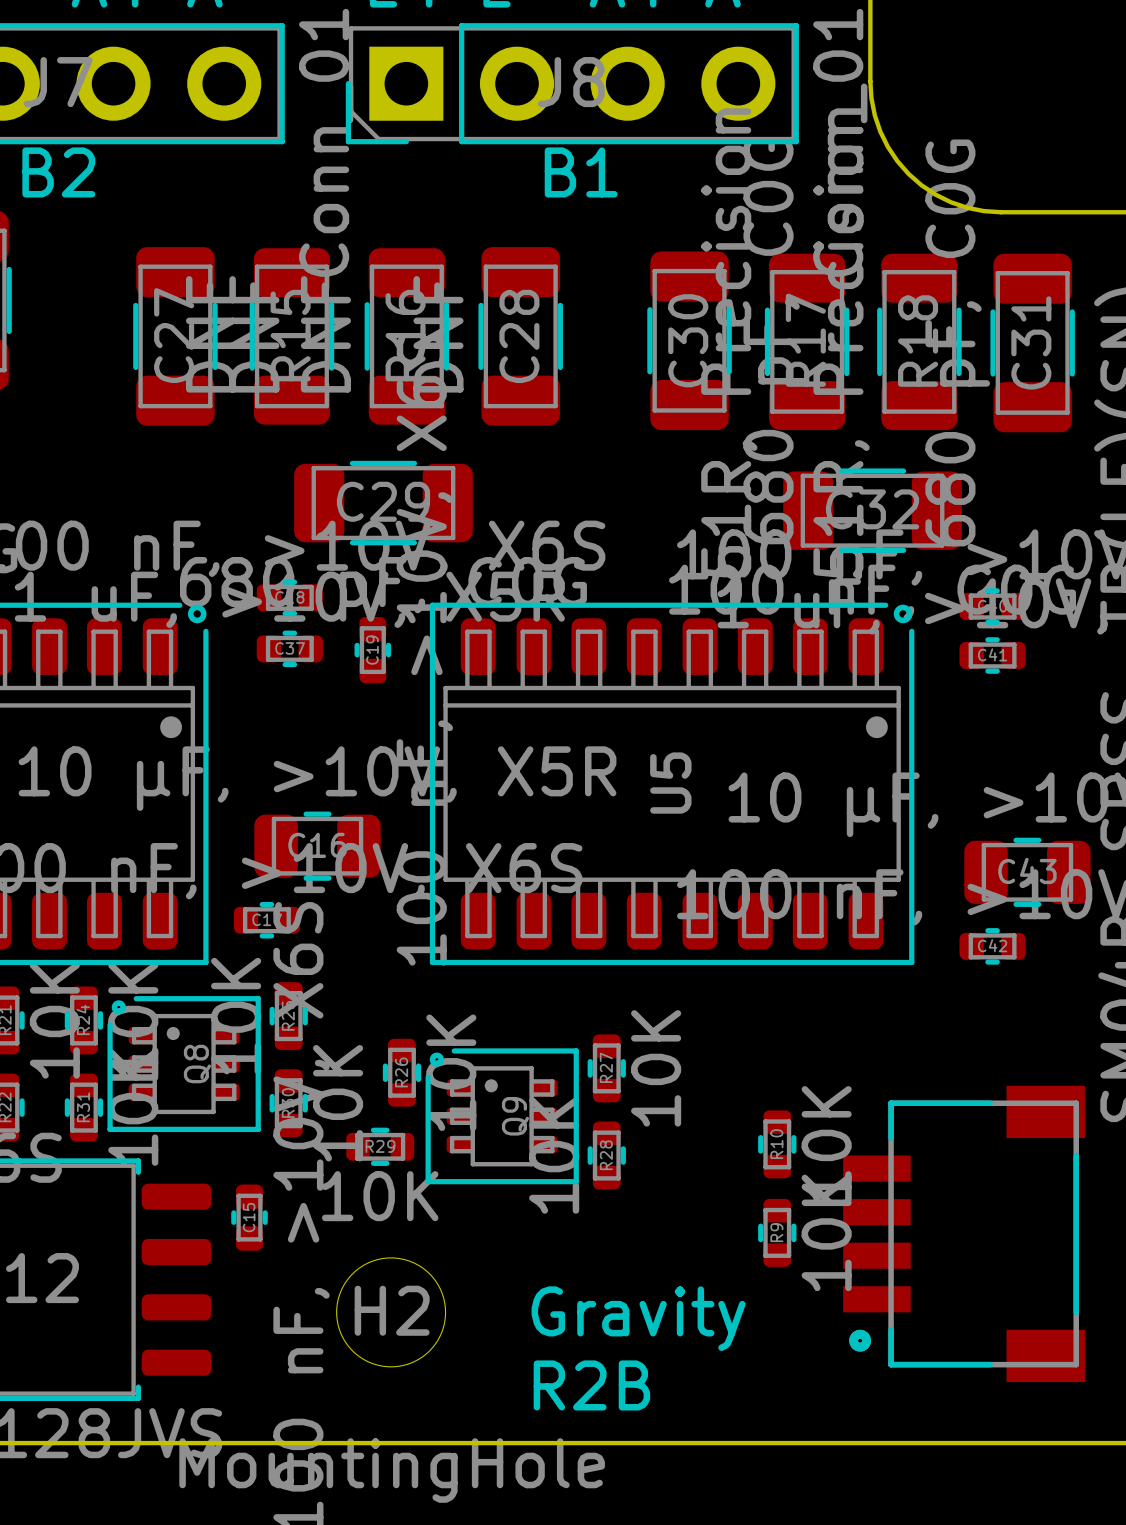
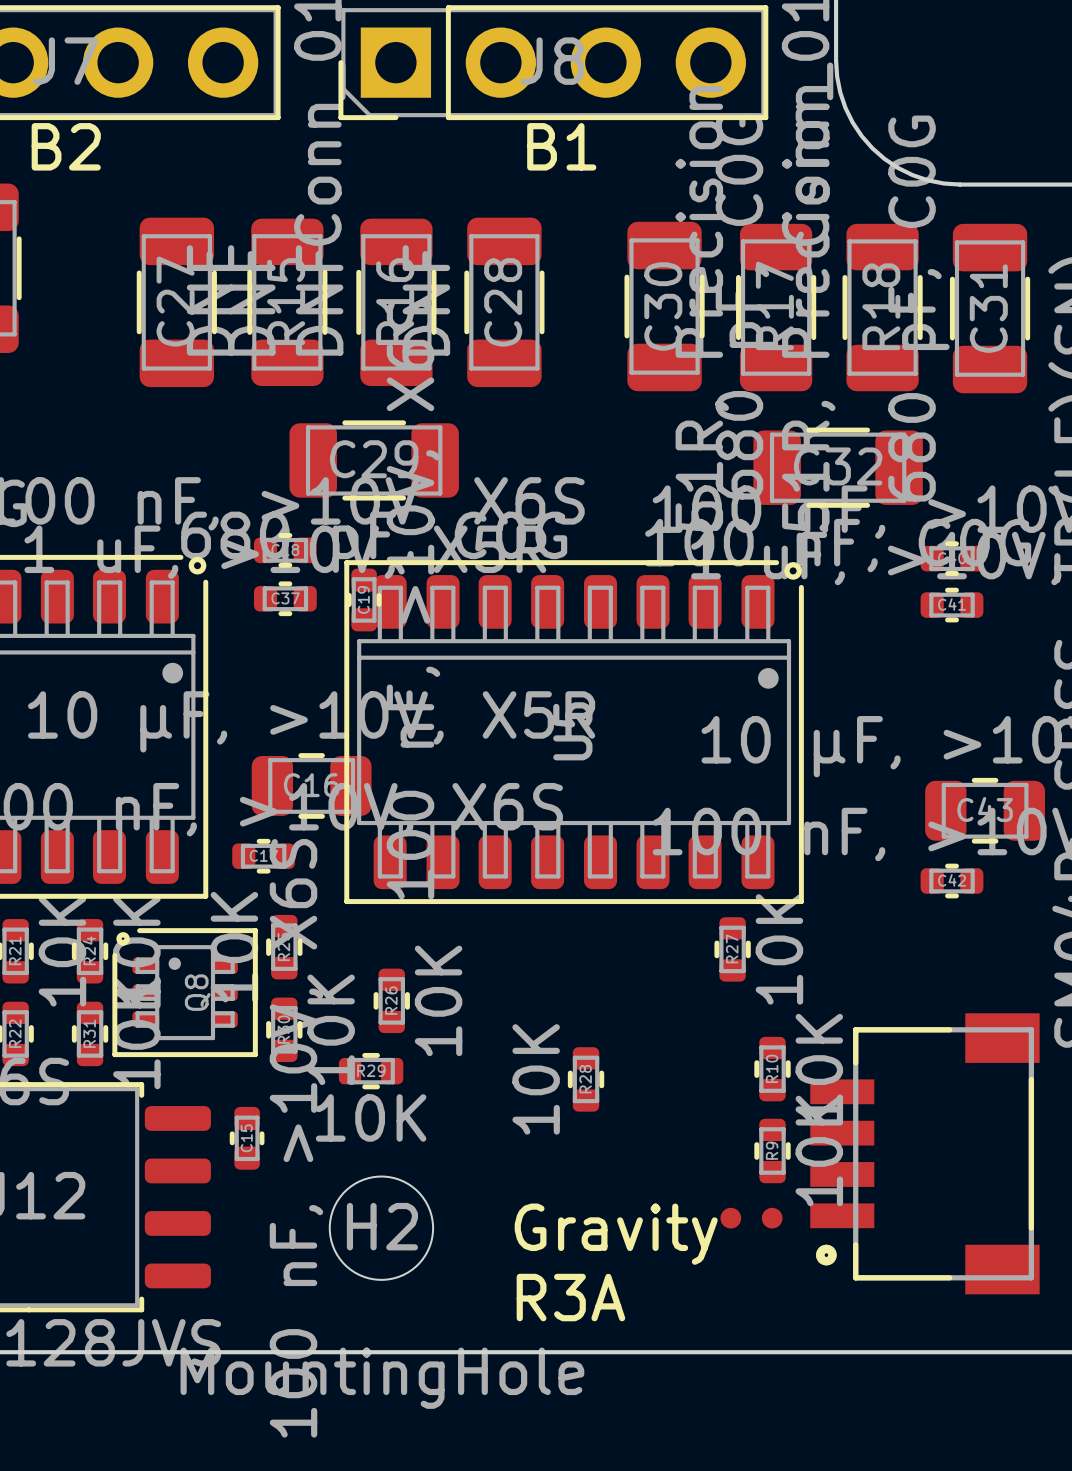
U5 position: (672, 783) -> (574, 732)
R27 position: (606, 1068) -> (732, 949)
Q9: (502, 1116) -> none
R10 position: (777, 1144) -> (772, 1069)
R9 position: (777, 1232) -> (772, 1150)
part: none -> (751, 1218)
text: R2B (591, 1385) -> R3A (570, 1297)

